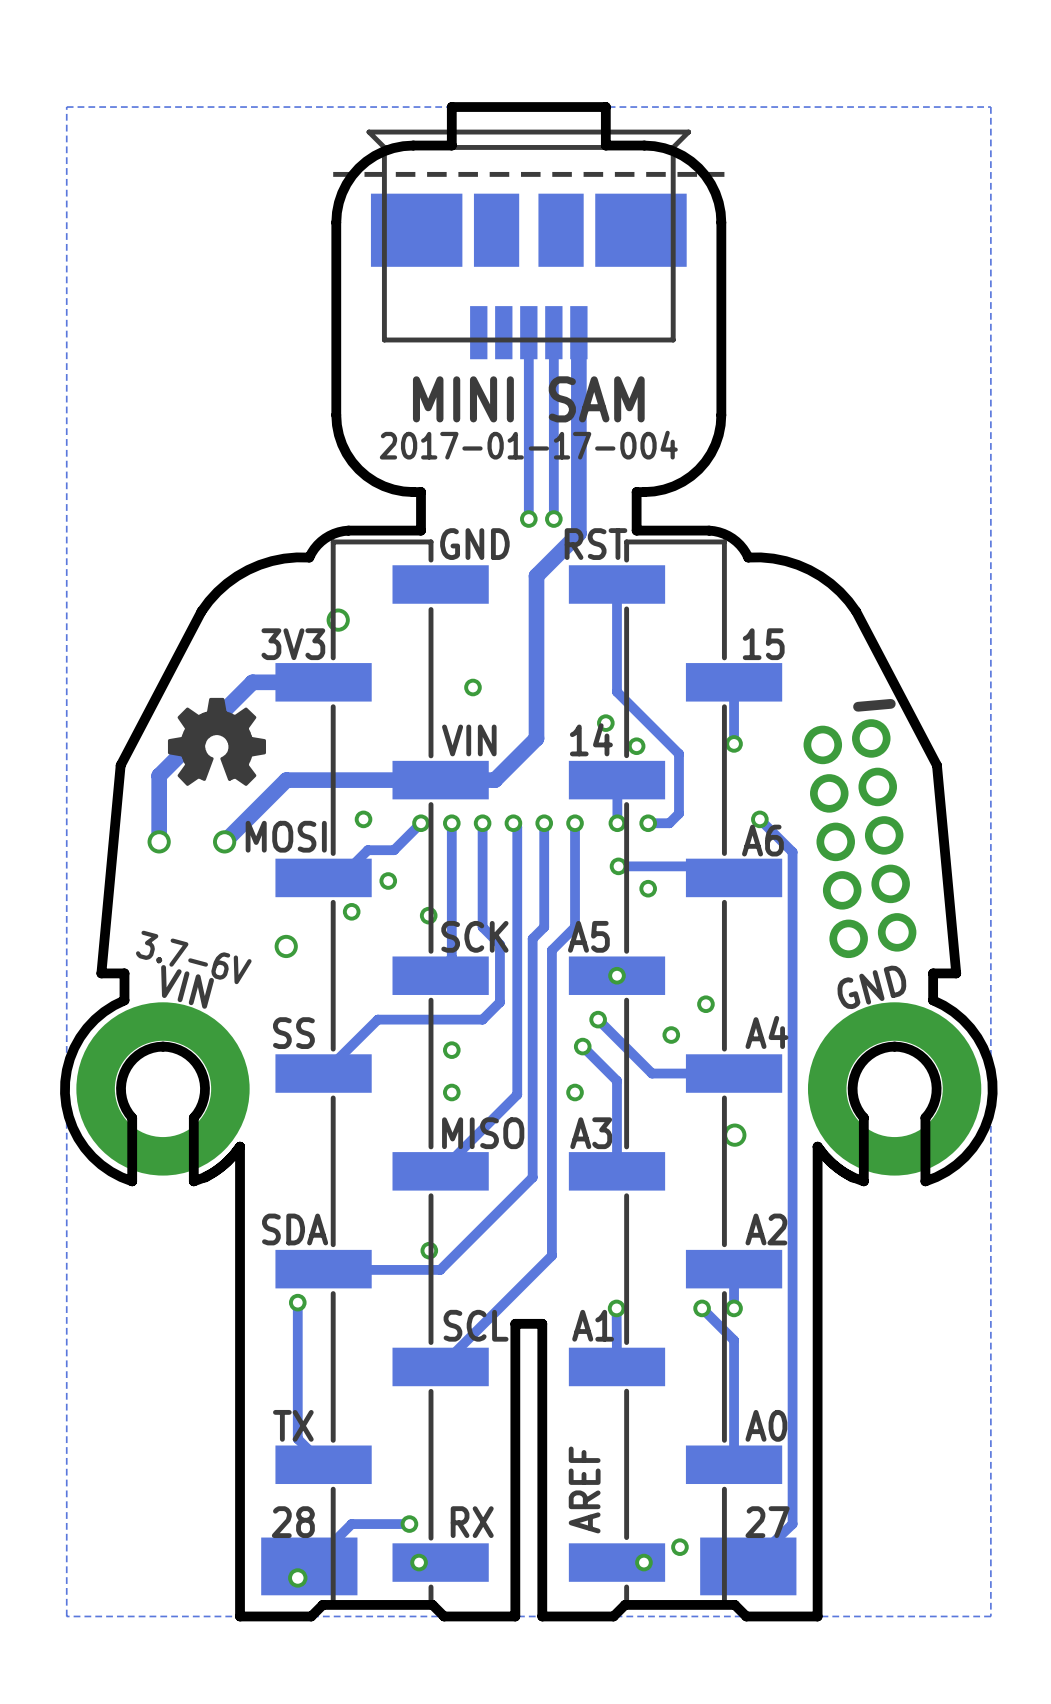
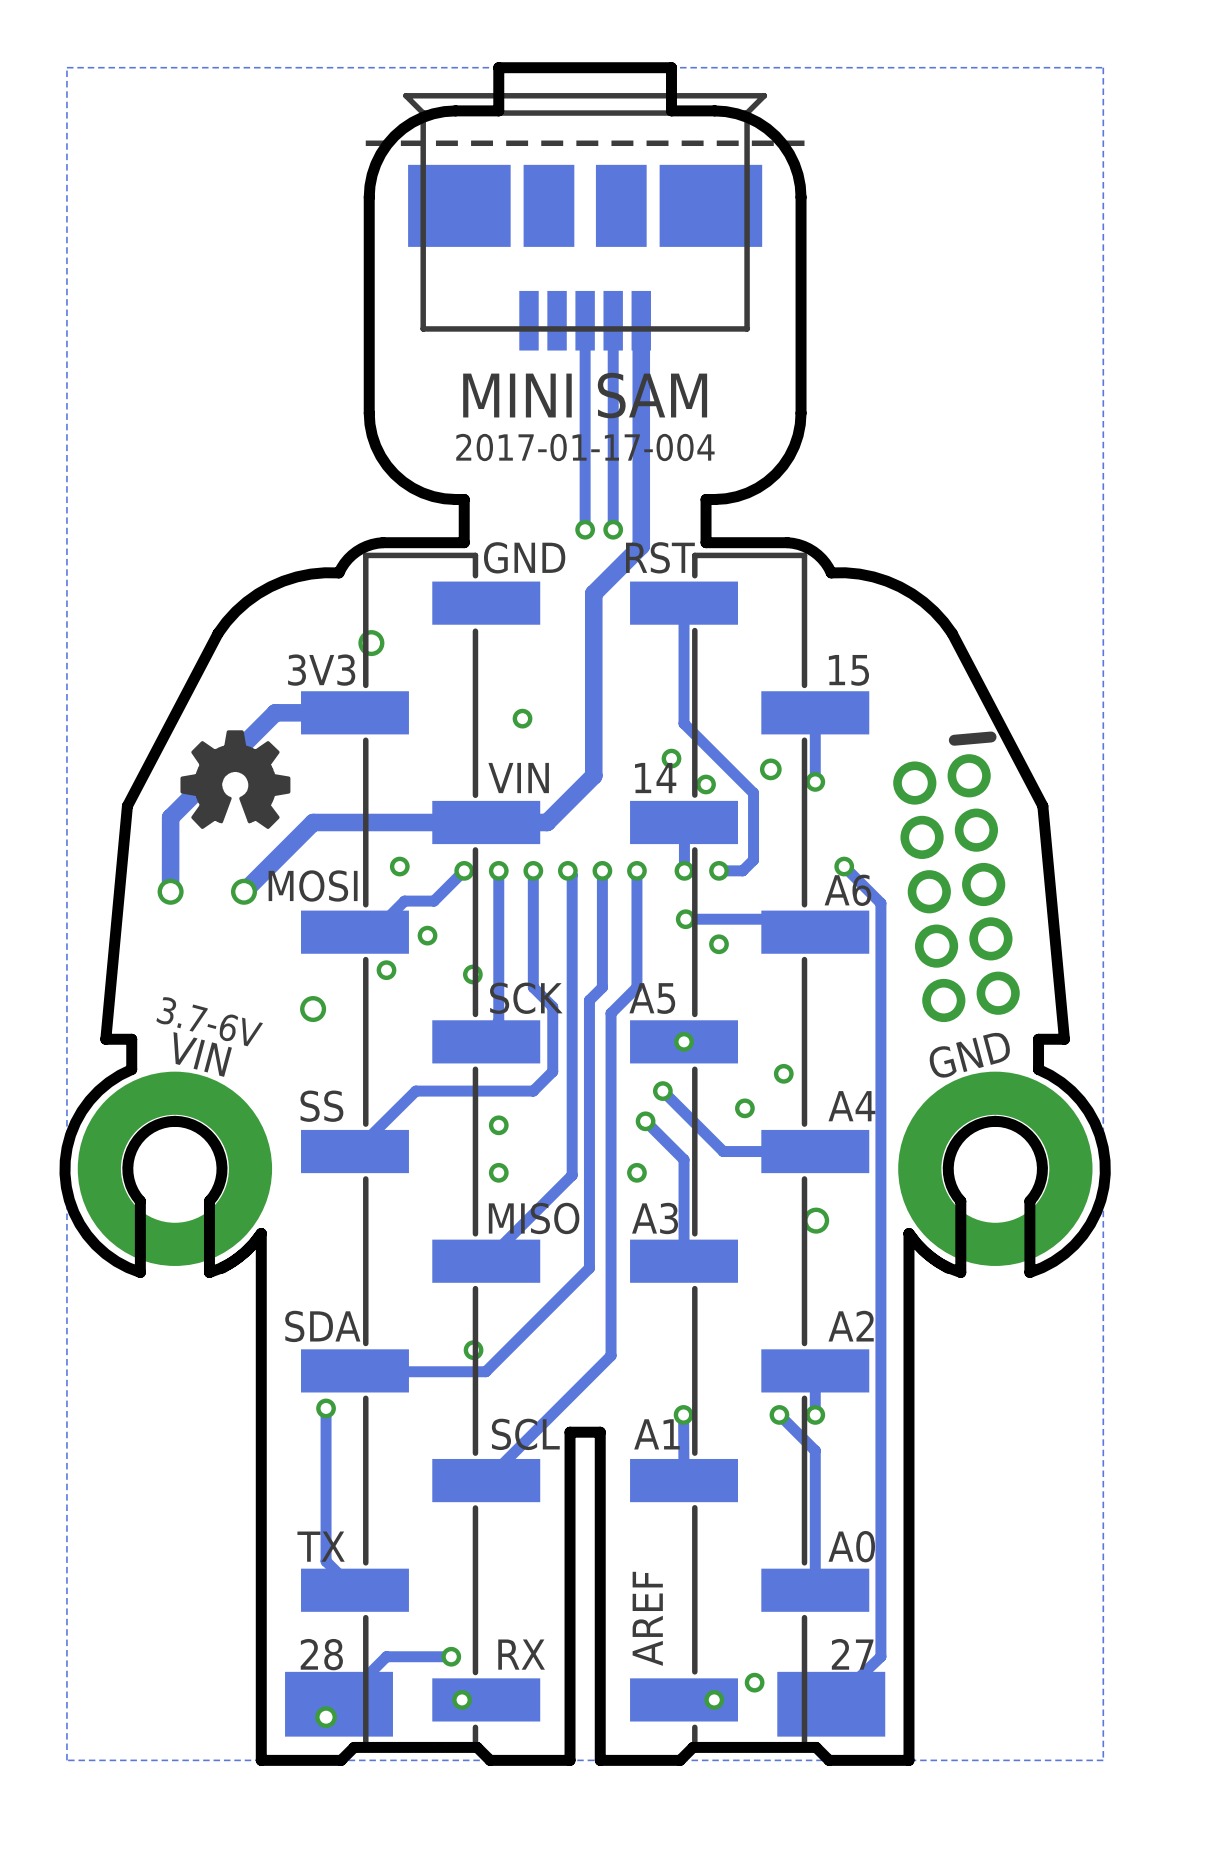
via: none -> (770, 769)

